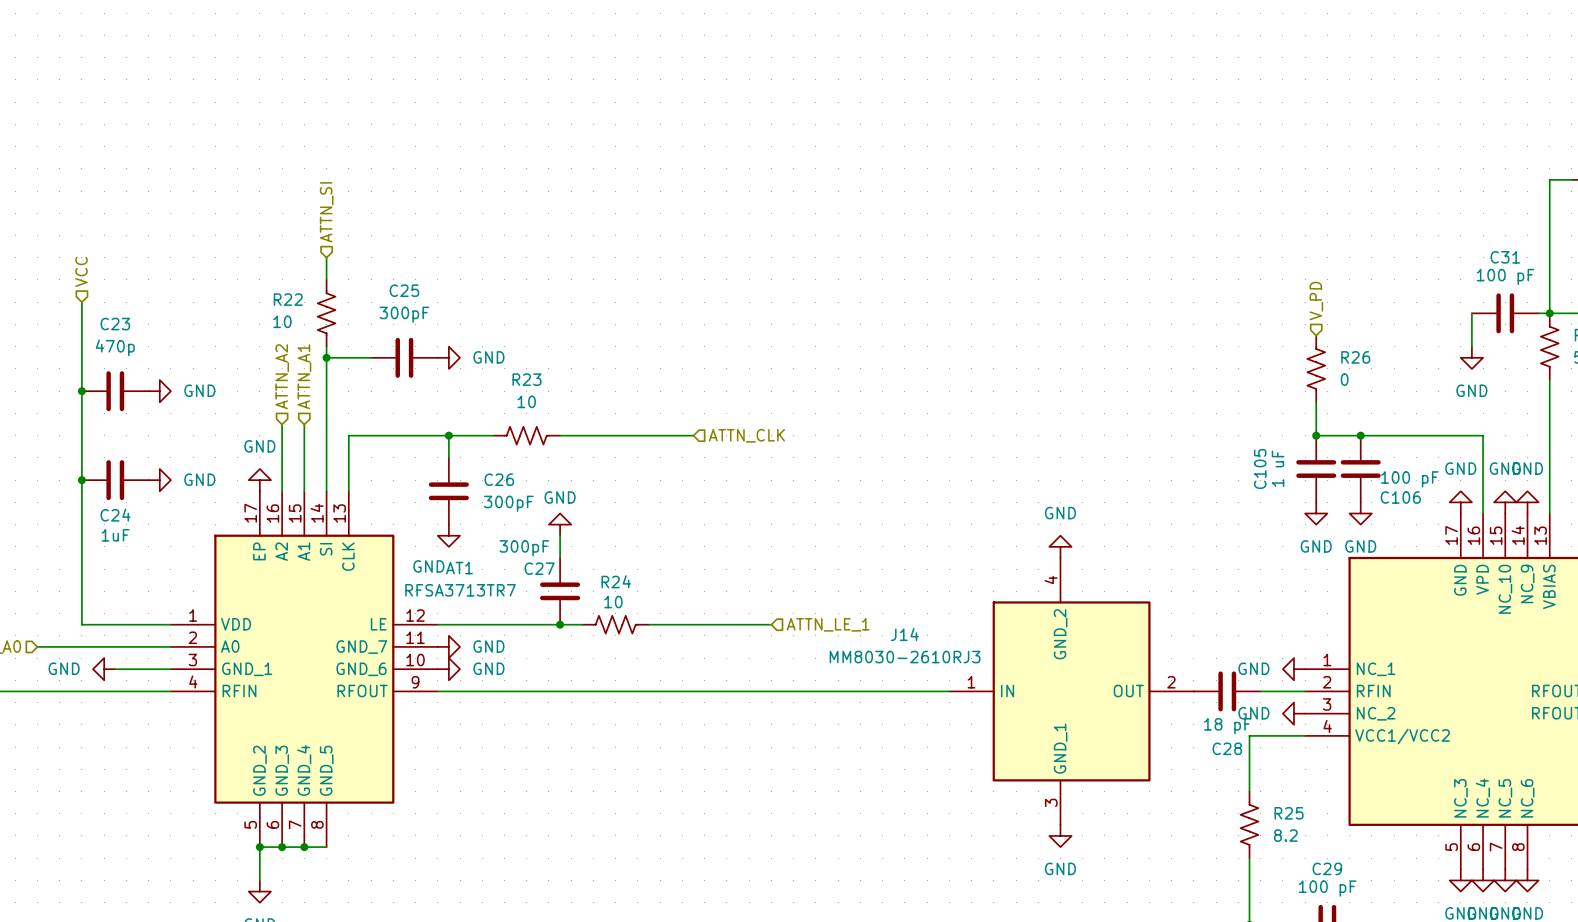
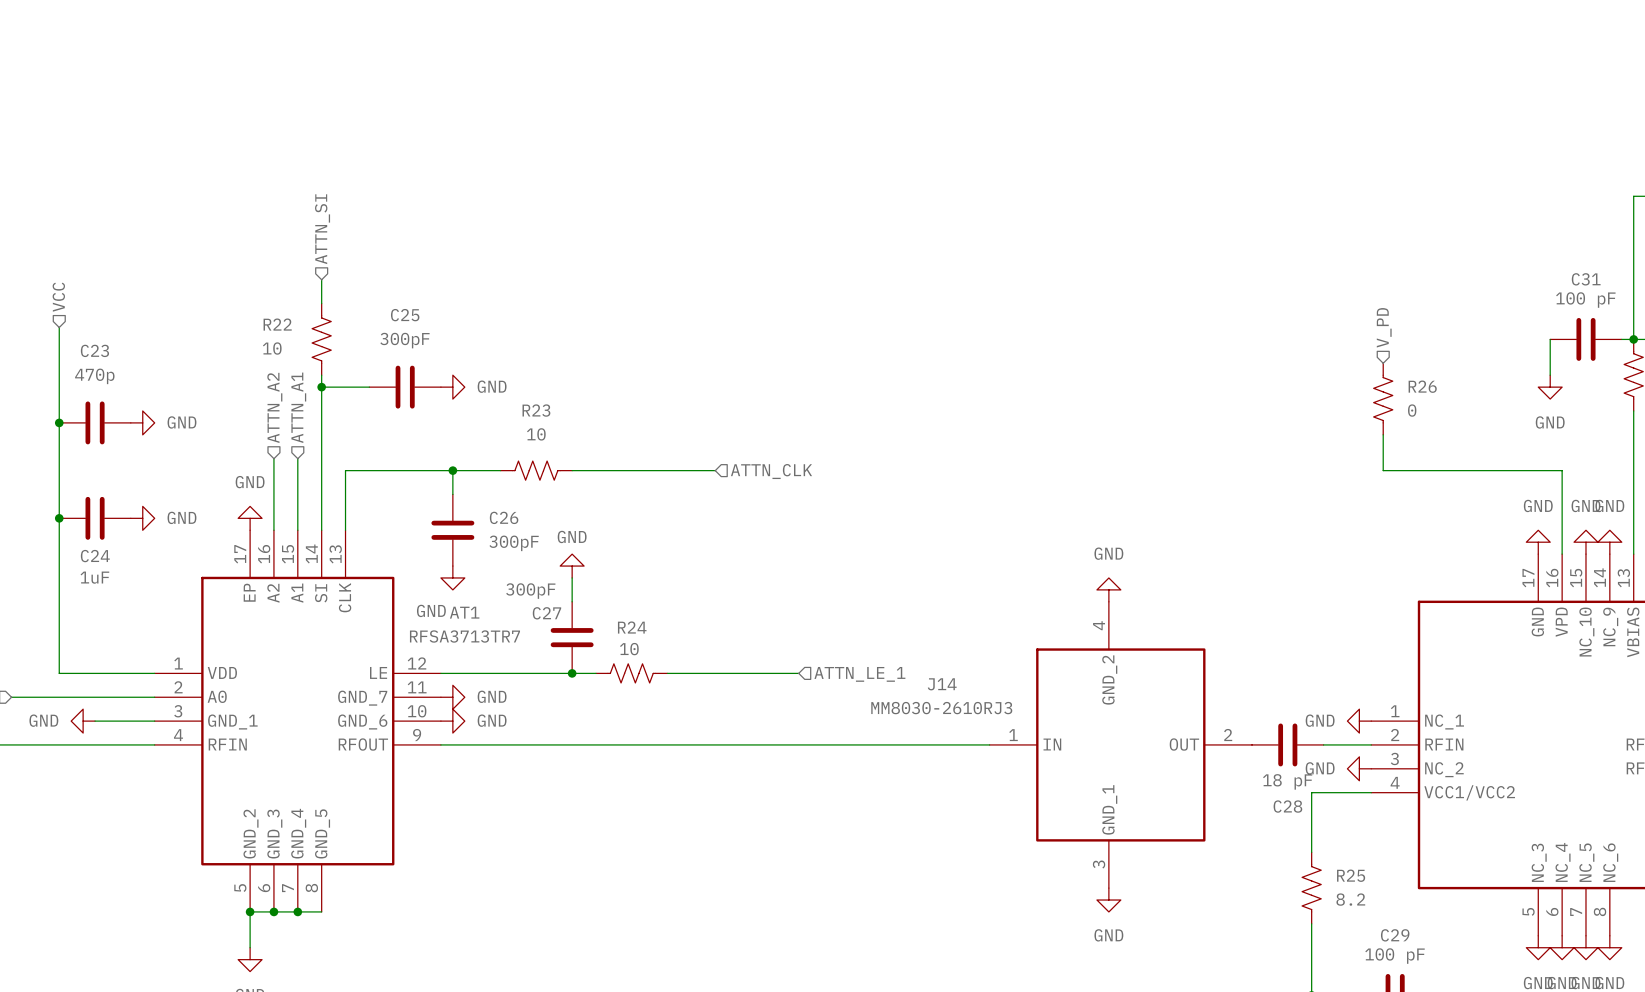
junction: (1316, 435) -> none
junction: (1360, 435) -> none
C105: 1 uF (1316, 469) -> none
C106: 100 pF (1360, 469) -> none
power symbol: GND (1316, 513) -> none
power symbol: GND (1360, 513) -> none

